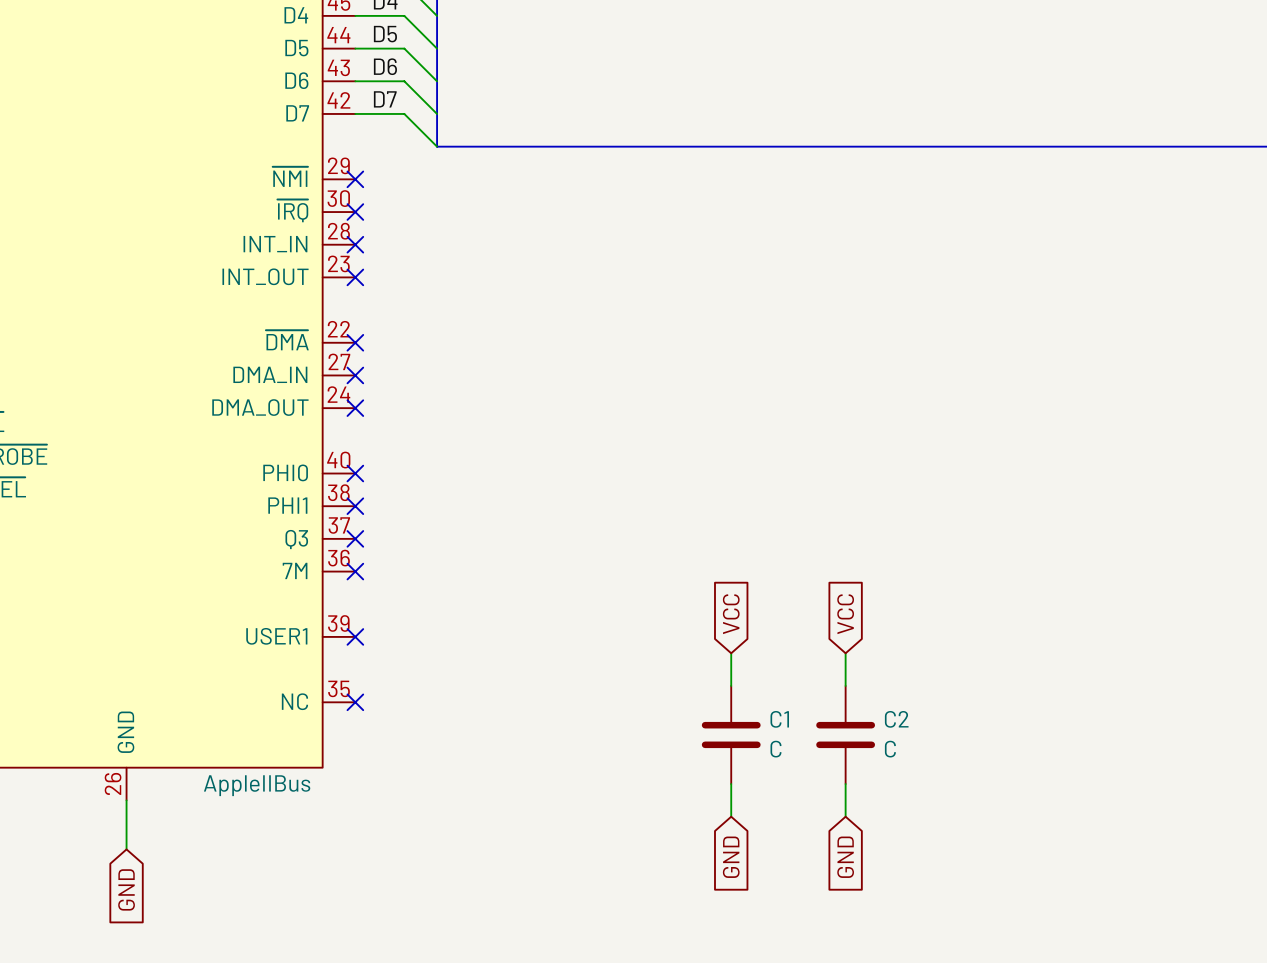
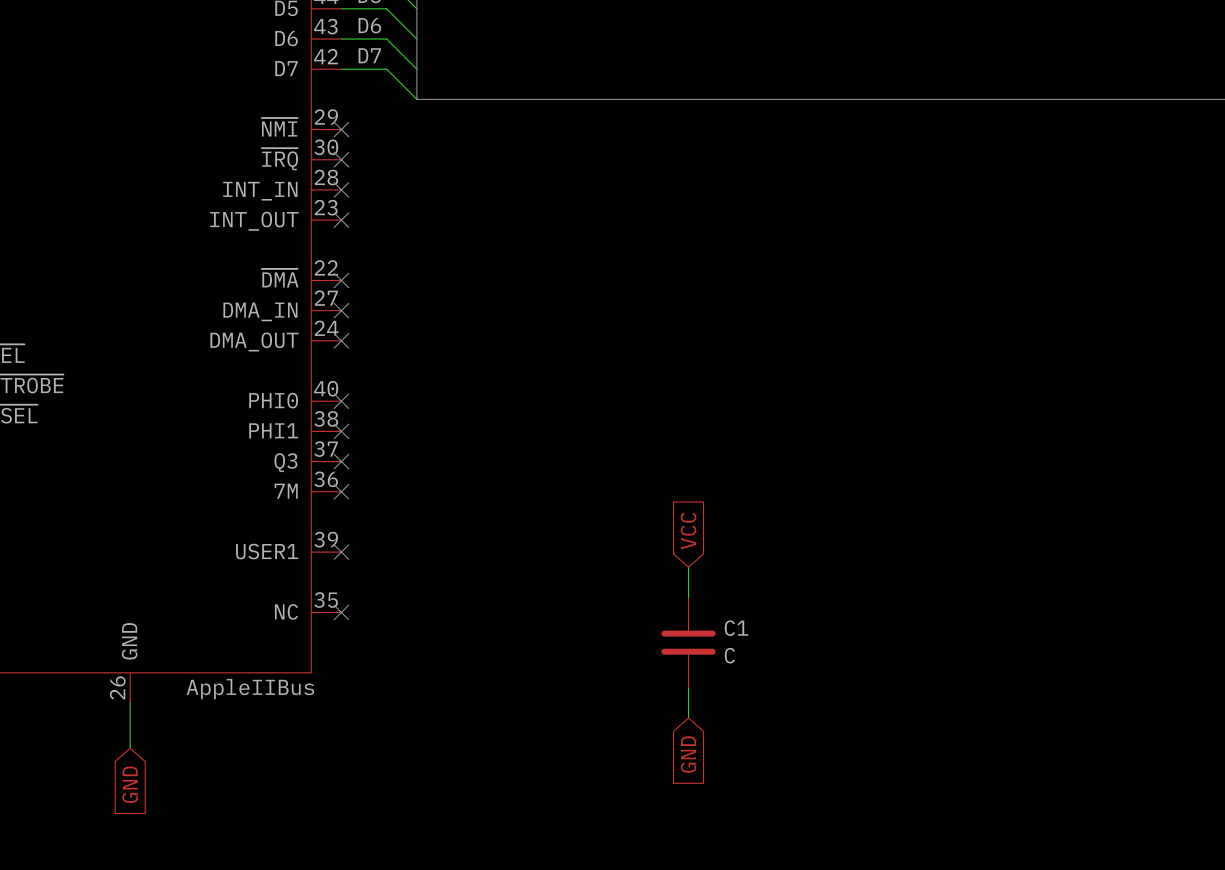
global label: VCC (845, 614) -> none
wire: (845, 653) (845, 685) -> none
C2: C (845, 735) -> none
wire: (845, 784) (845, 816) -> none
global label: GND (845, 857) -> none

